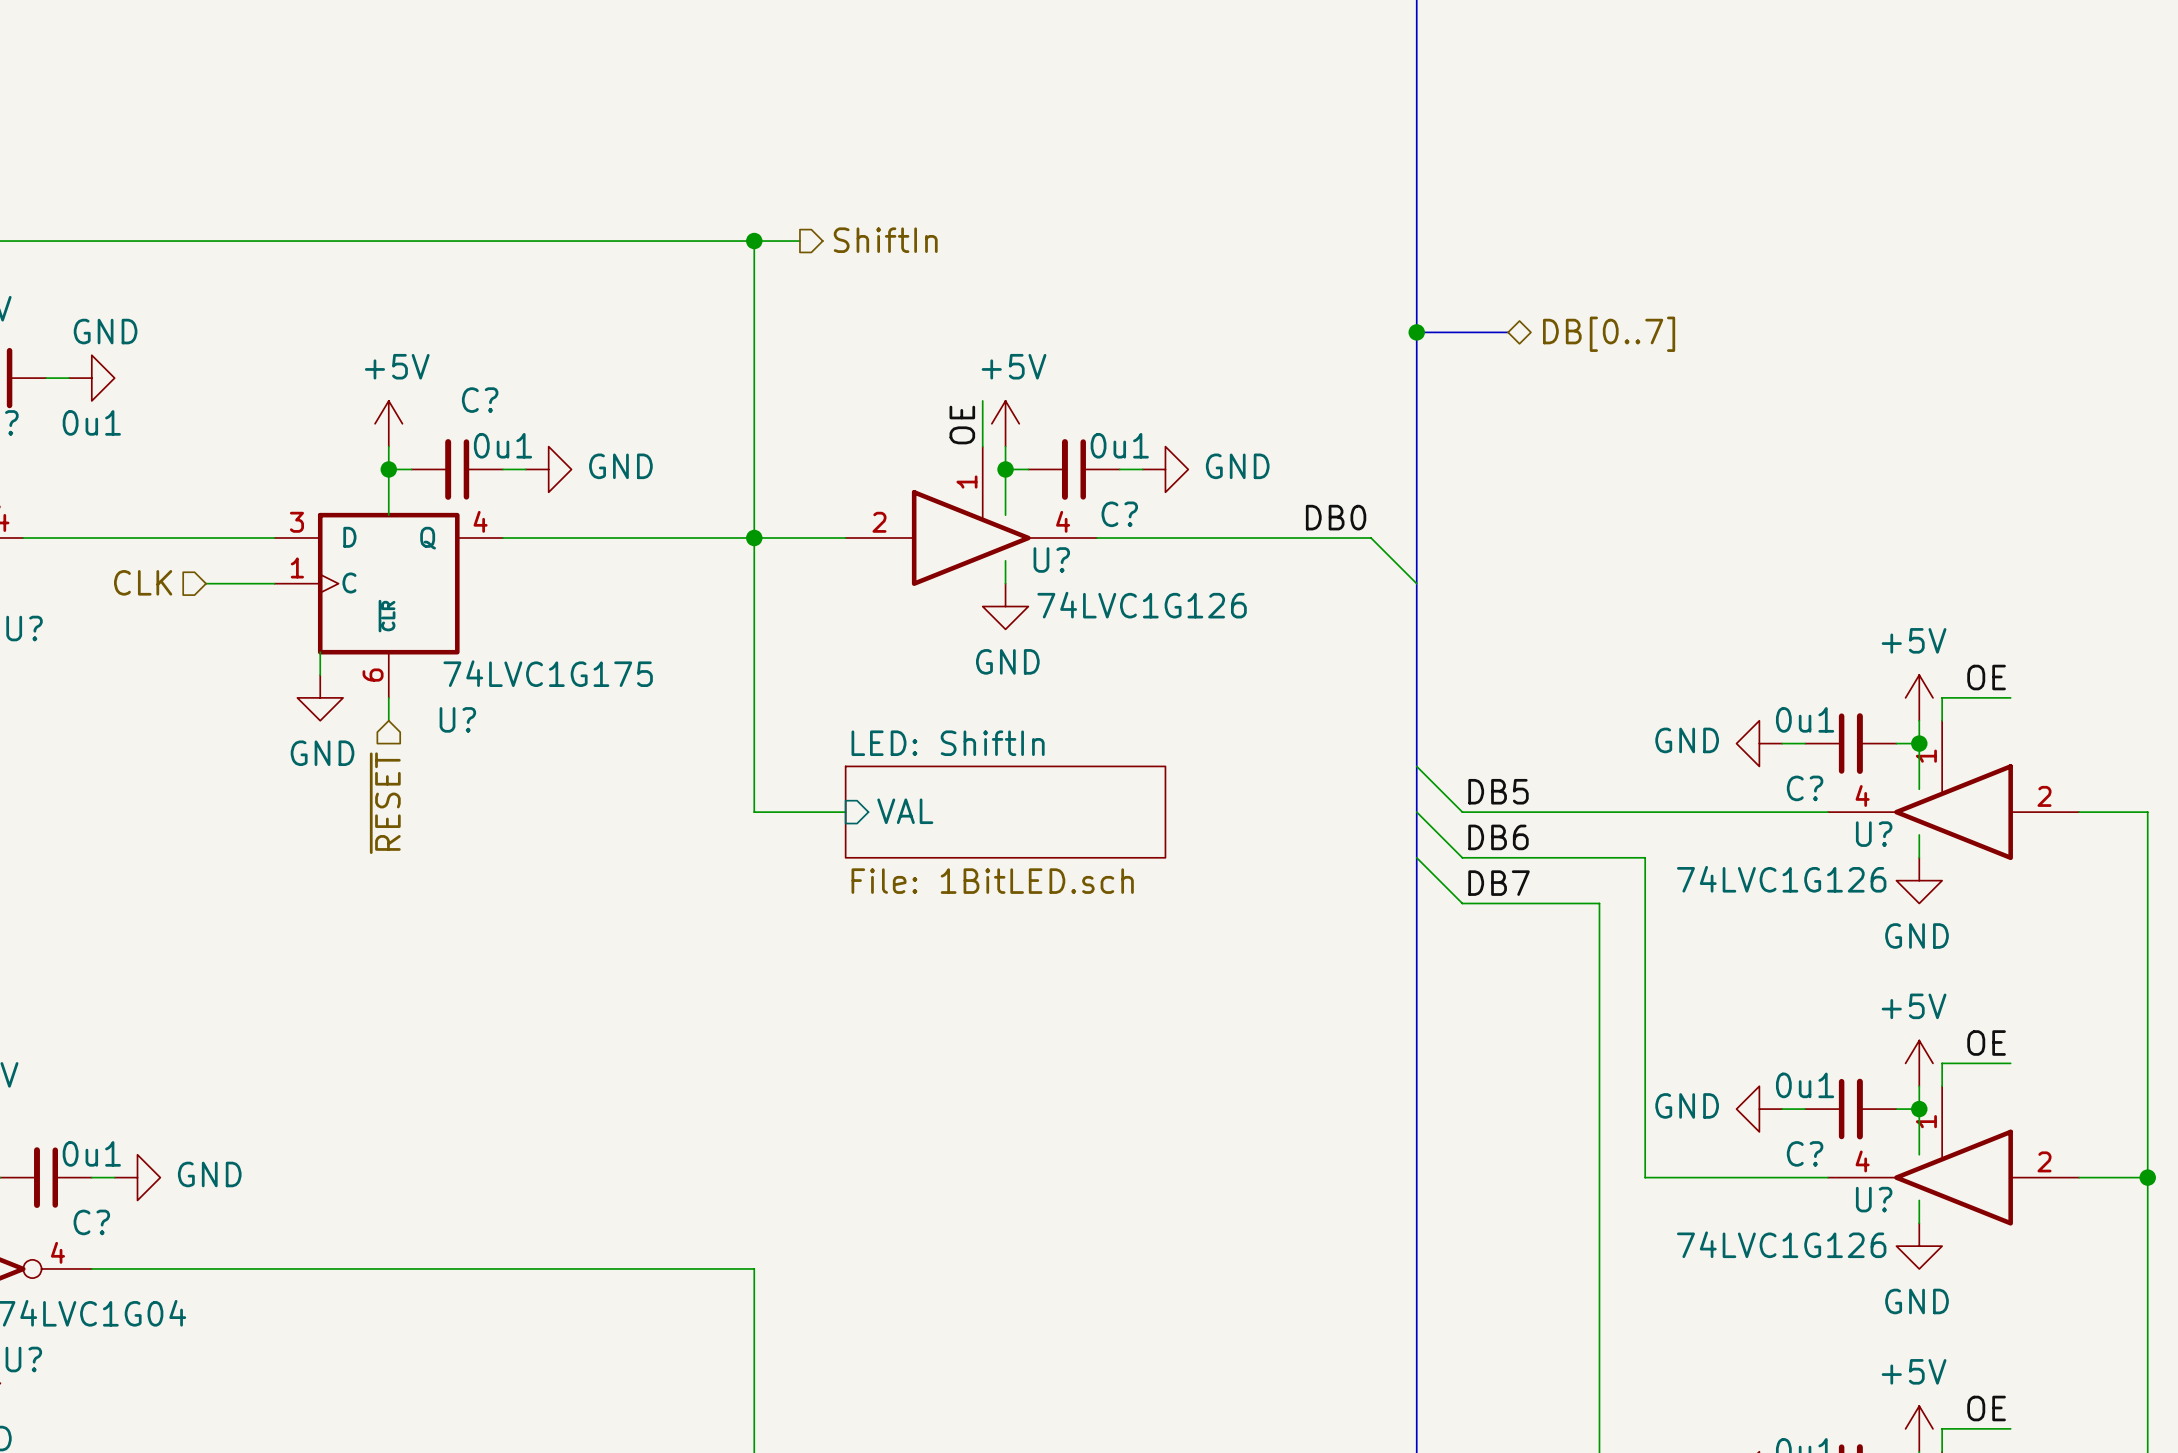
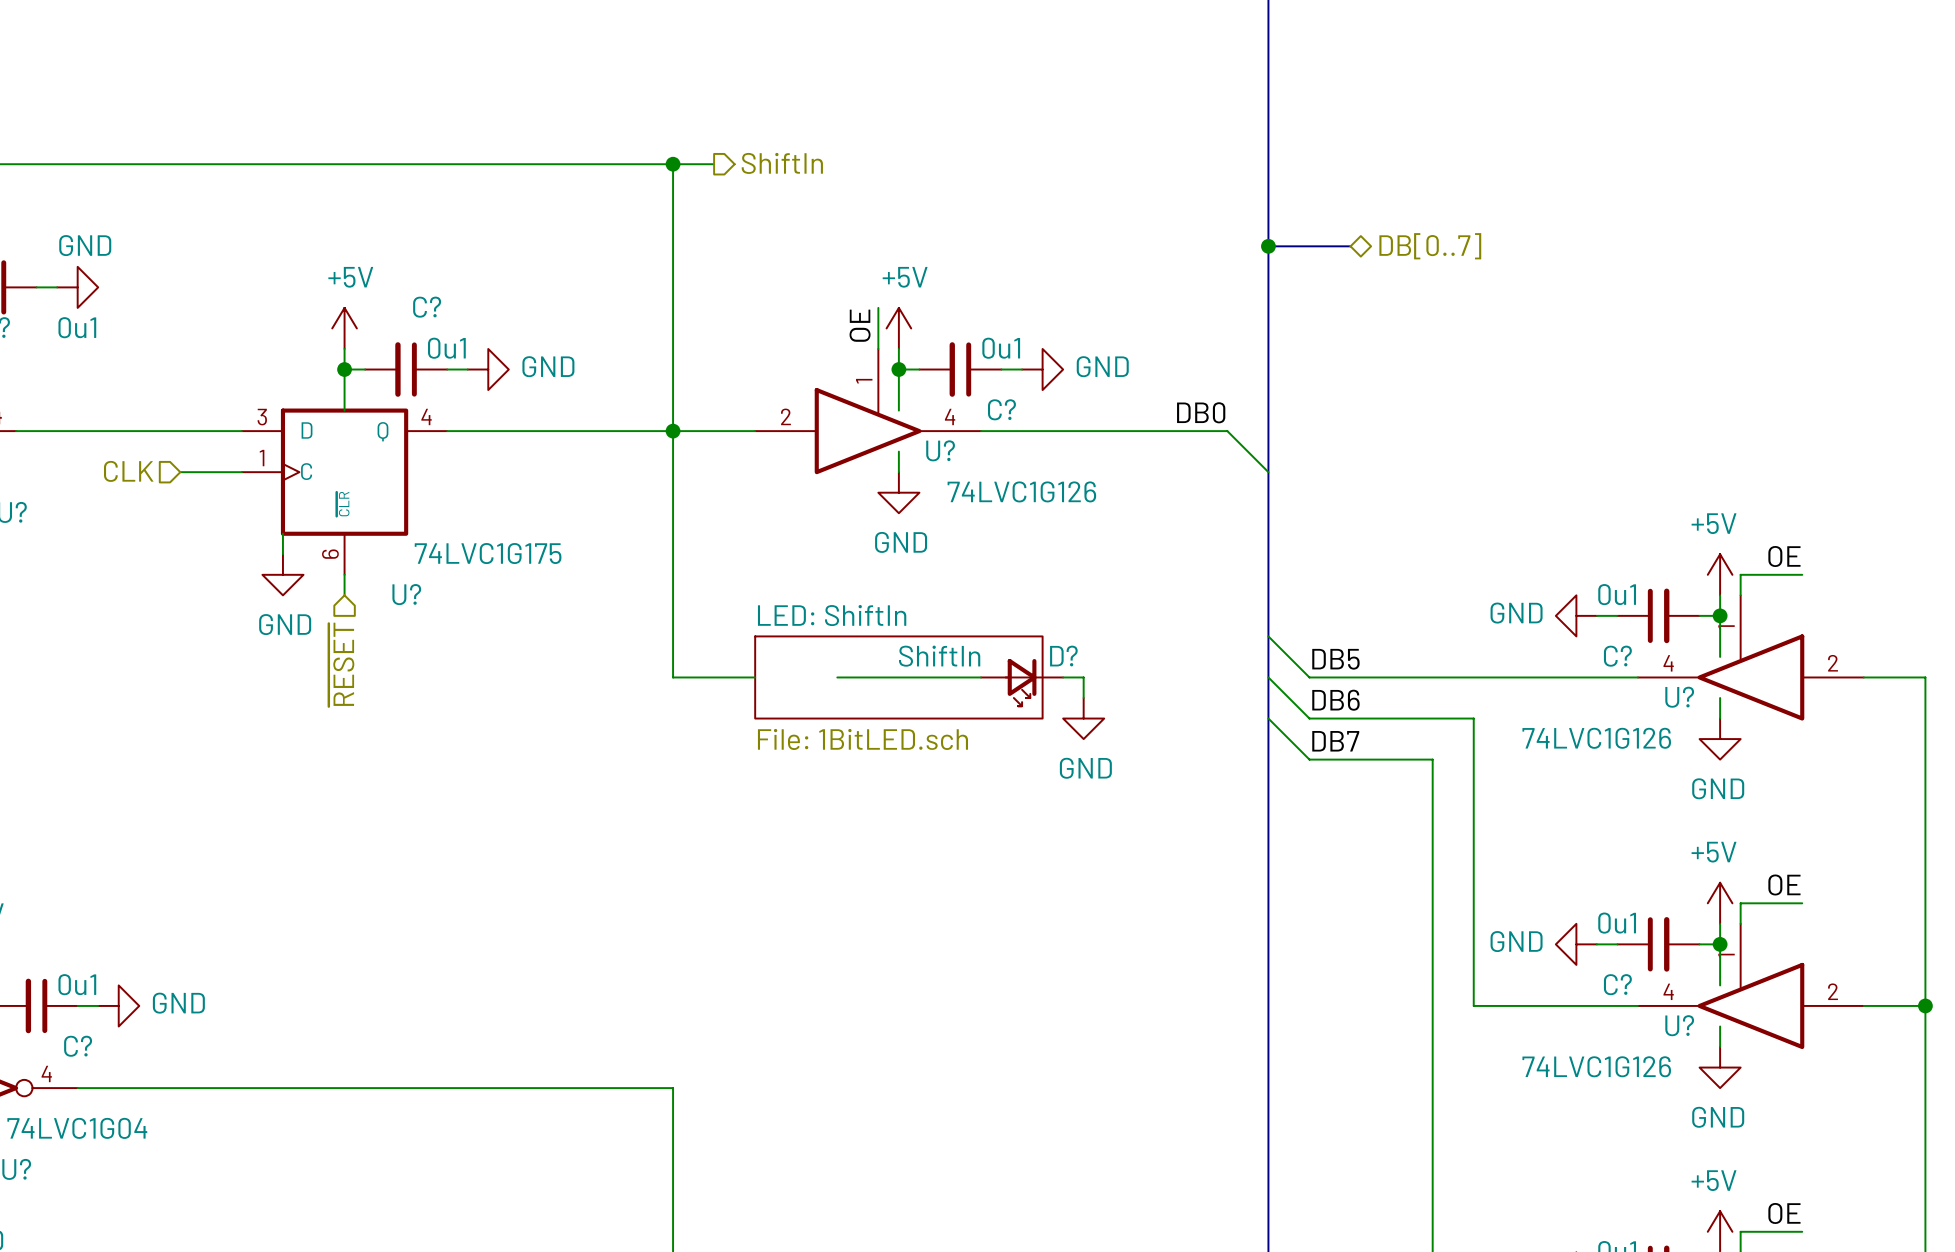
sheet pin: VAL (905, 811) -> none
wire: none -> (837, 677) (981, 677)
wire: none -> (1063, 677) (1083, 677) (1083, 698)
D?: none -> ShiftIn (1022, 682)
power symbol: none -> GND (1083, 718)

